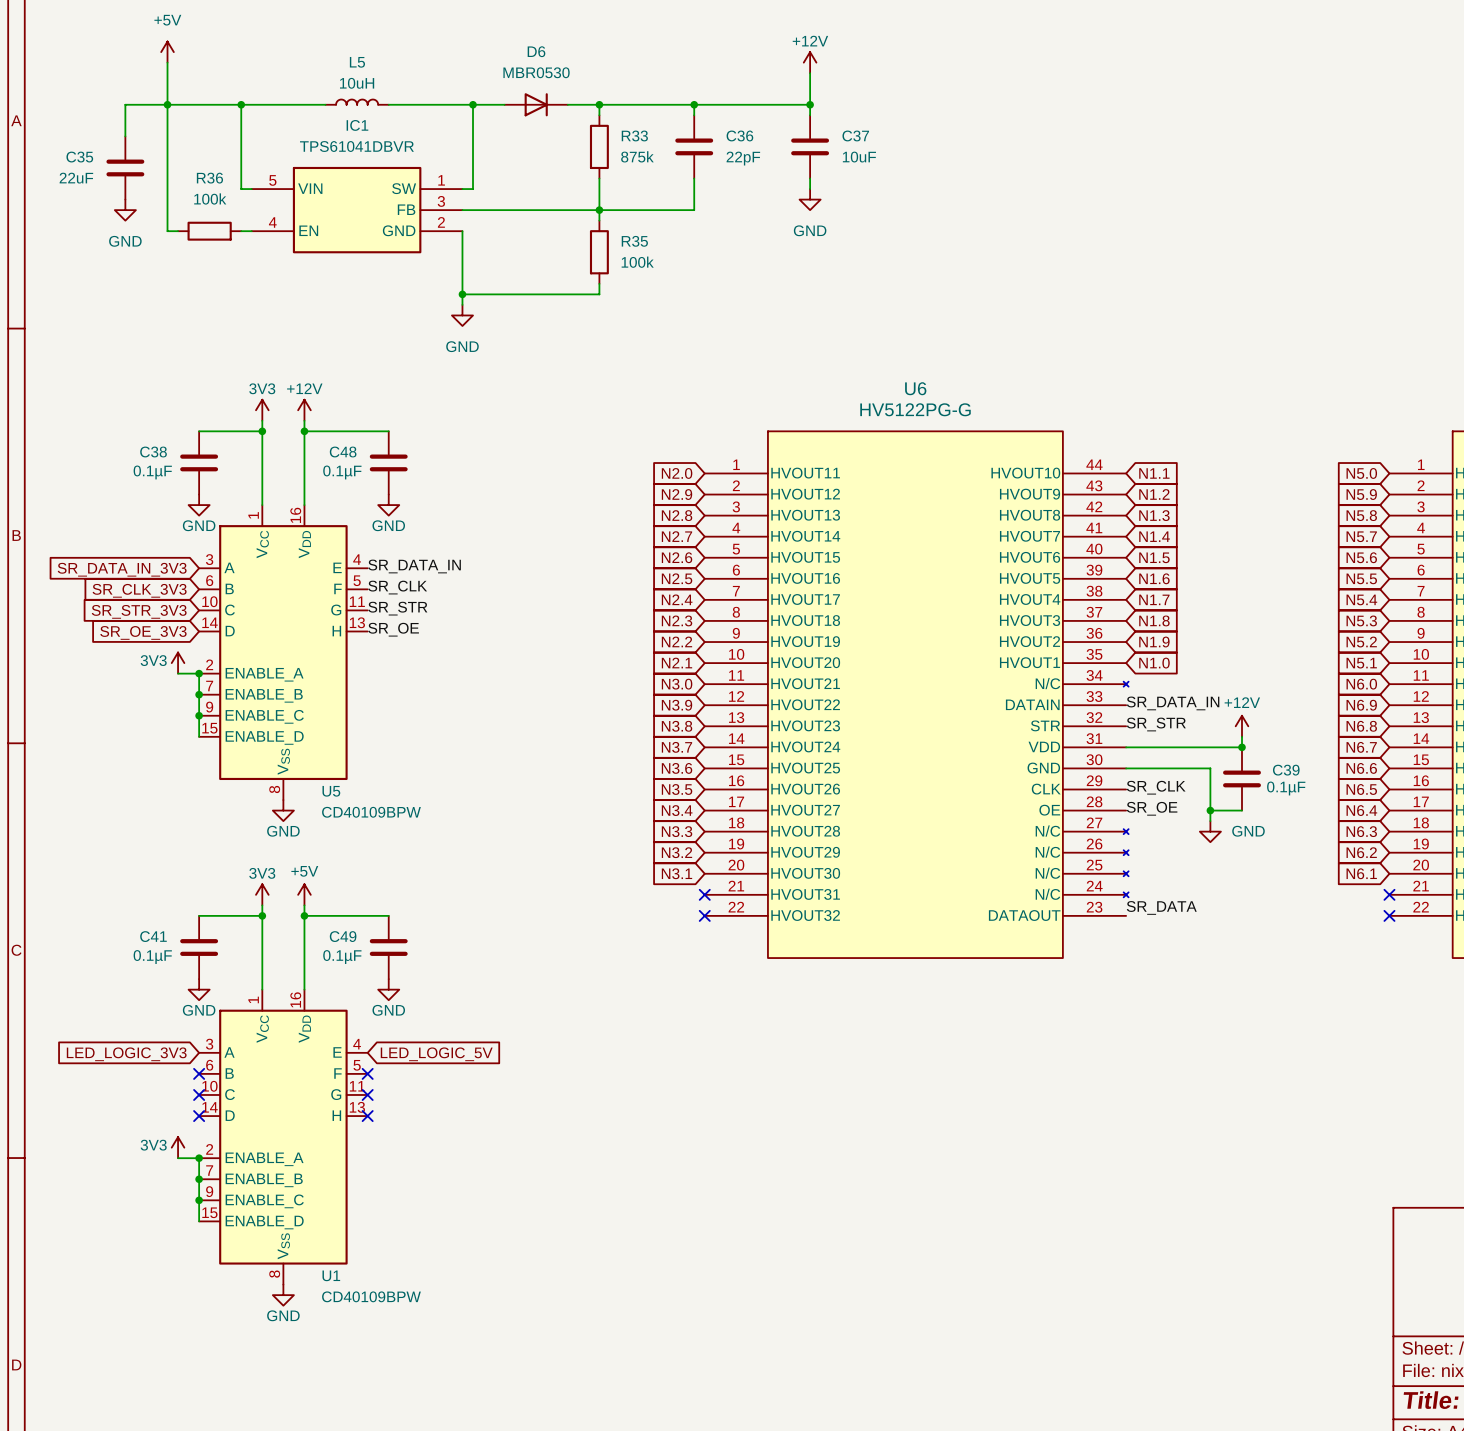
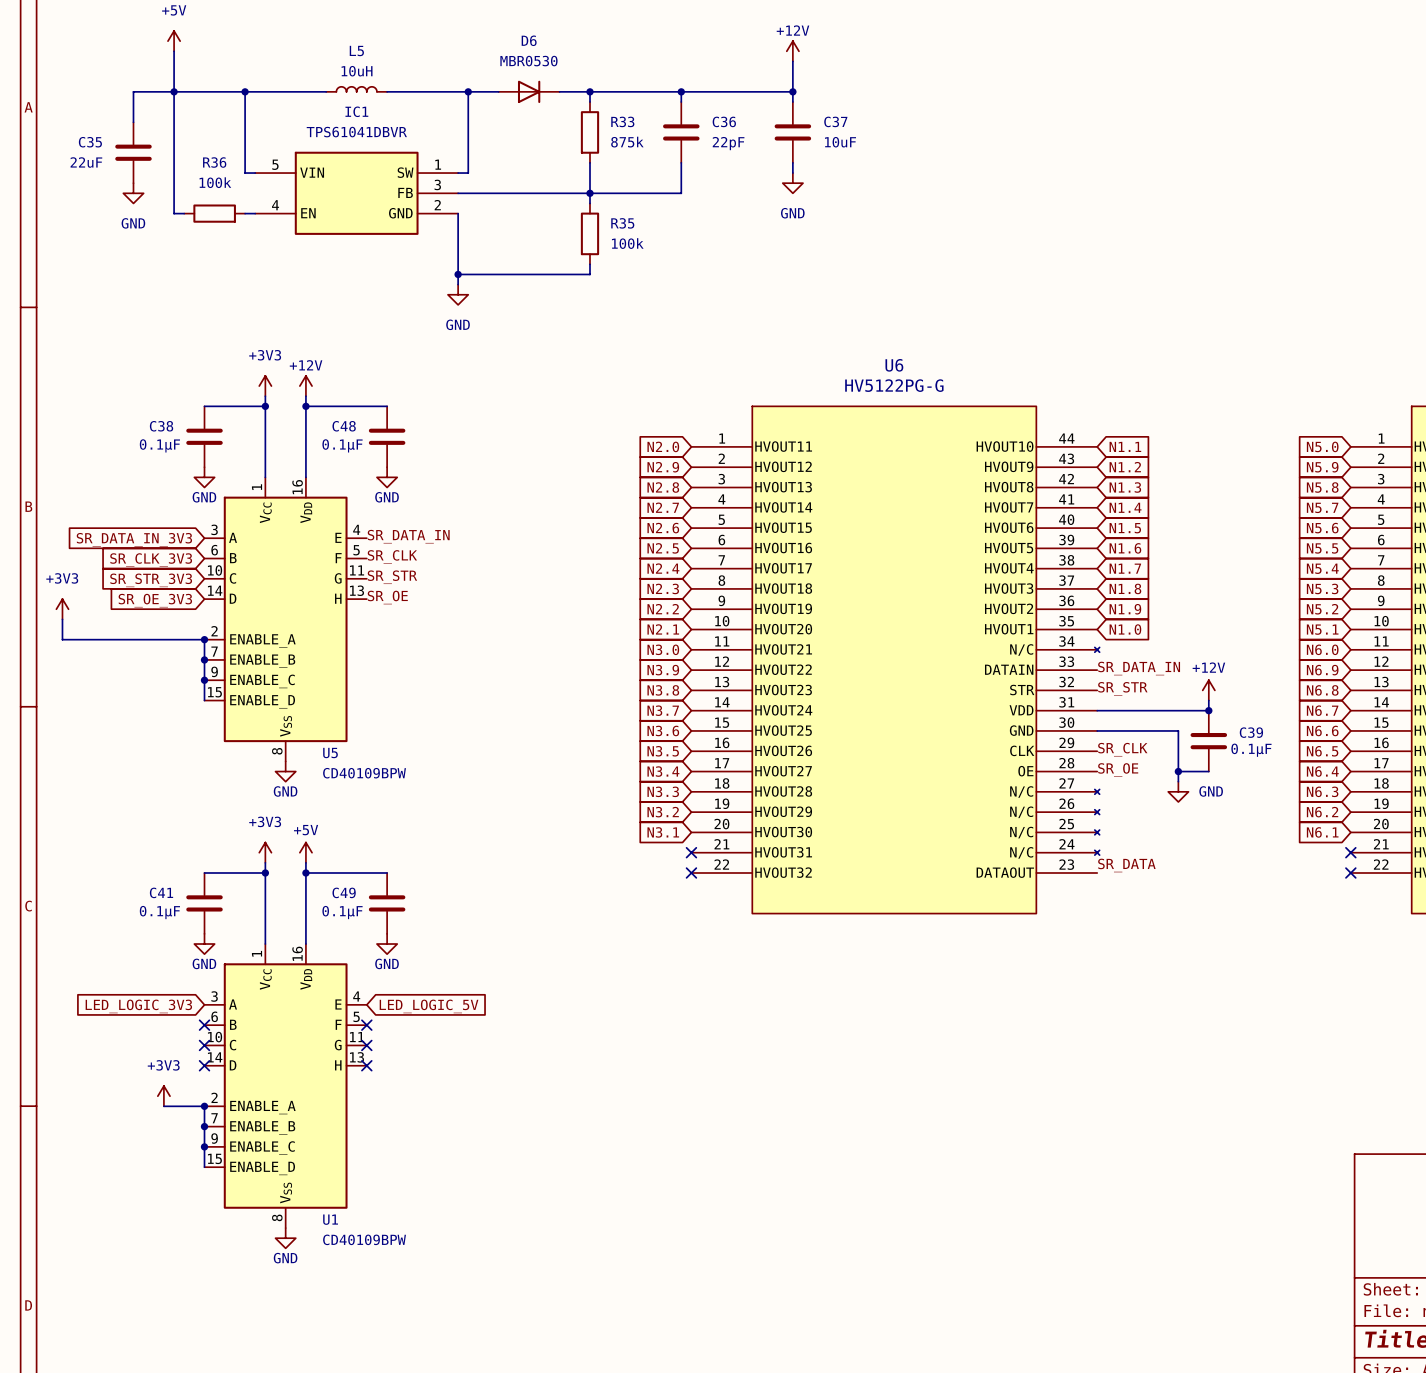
power symbol: 3V3 (262, 410) -> +3V3 (265, 386)
power symbol: none -> +3V3 (62, 609)
wire: none -> (62, 619) (62, 639) (184, 639)
power symbol: 3V3 (178, 663) -> none
power symbol: 3V3 (262, 894) -> +3V3 (265, 852)
power symbol: none -> +3V3 (163, 1096)
power symbol: 3V3 (178, 1147) -> none
wire: none -> (163, 1106) (184, 1106)

